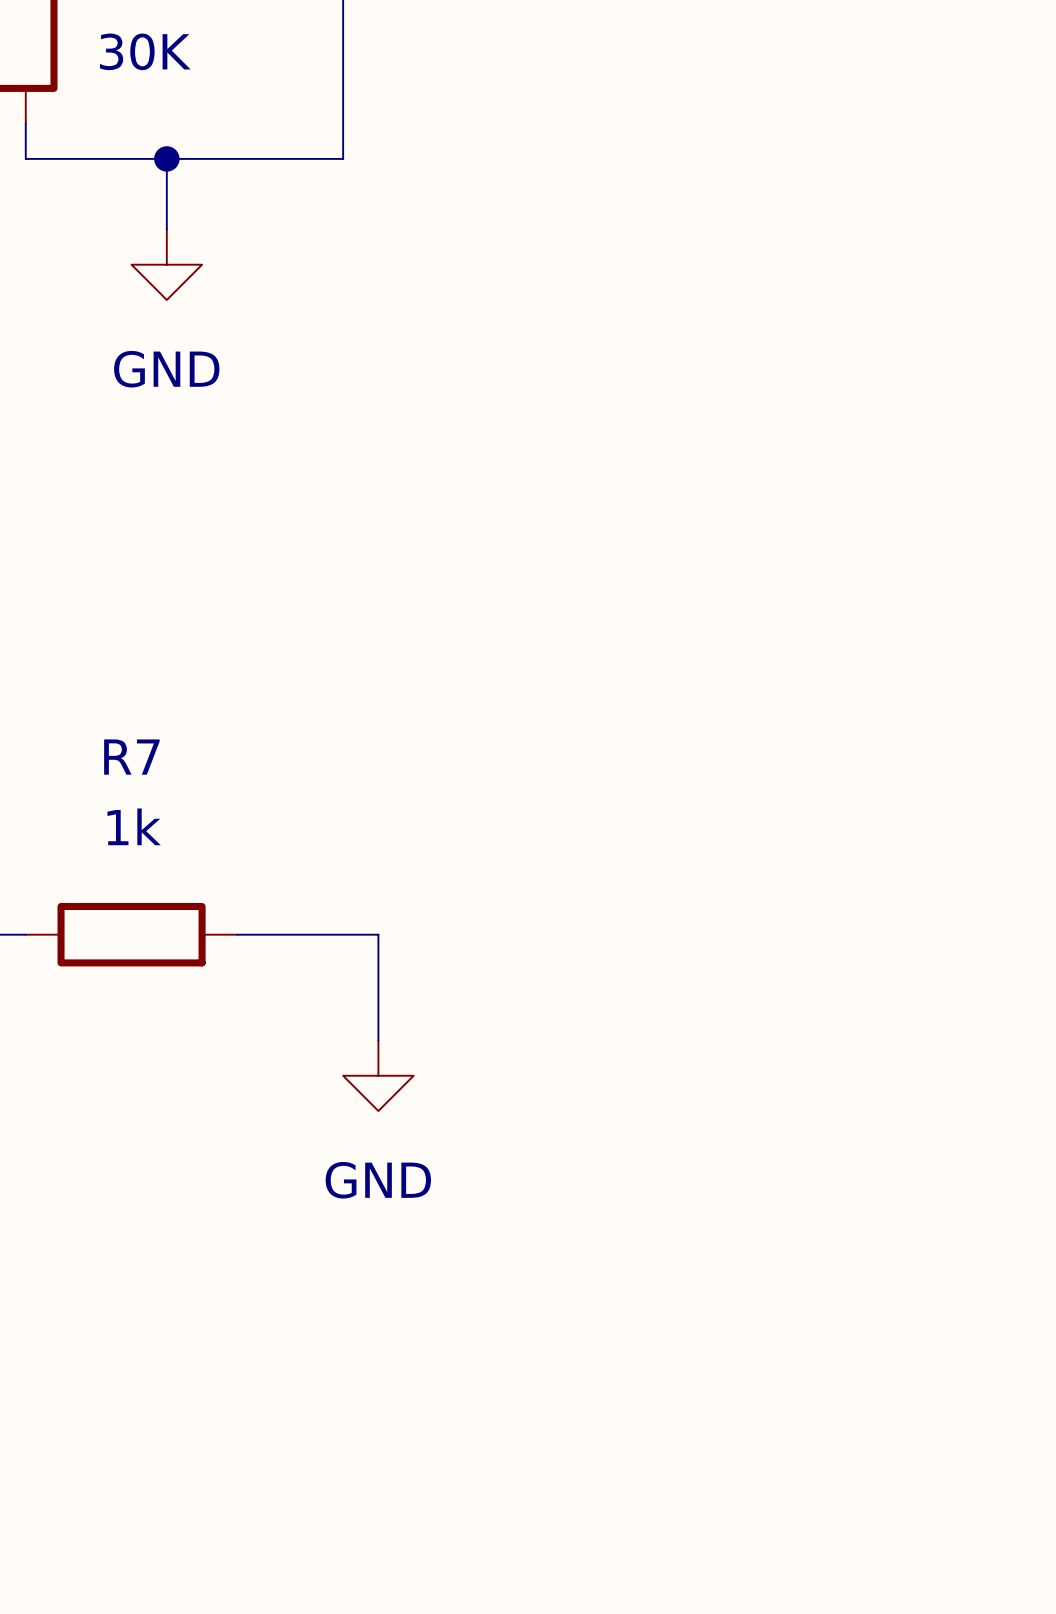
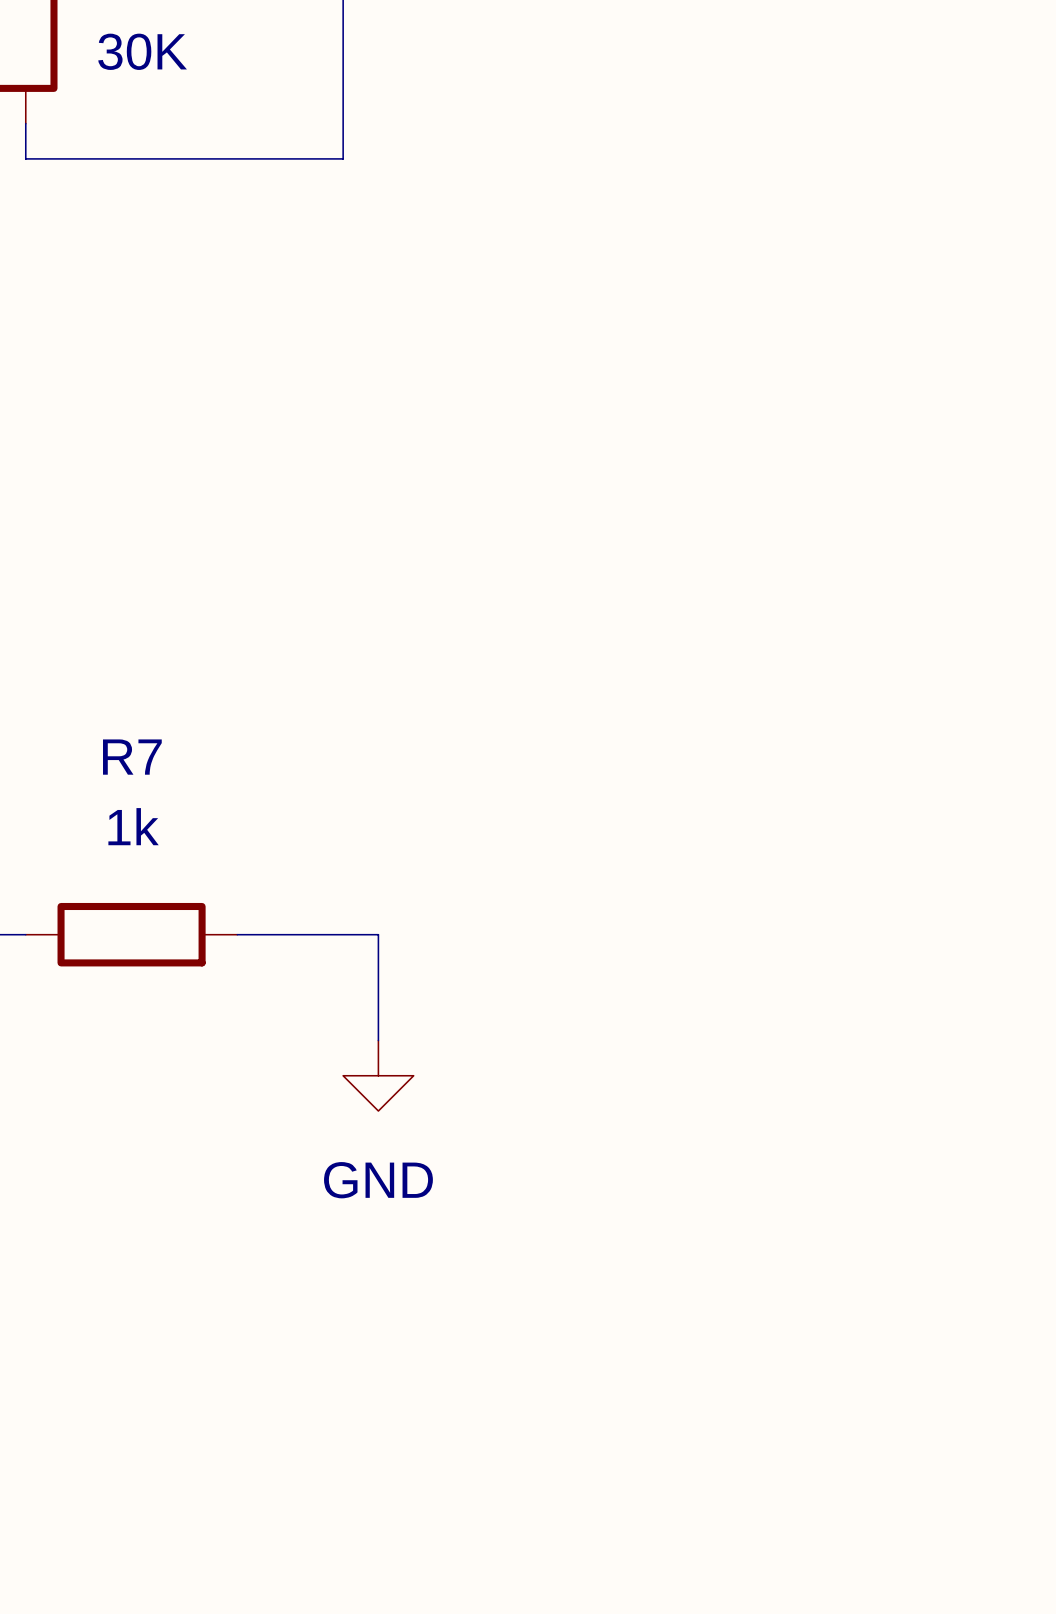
wire: (166, 158) (166, 229) -> none
junction: (166, 158) -> none
power symbol: GND (166, 264) -> none

